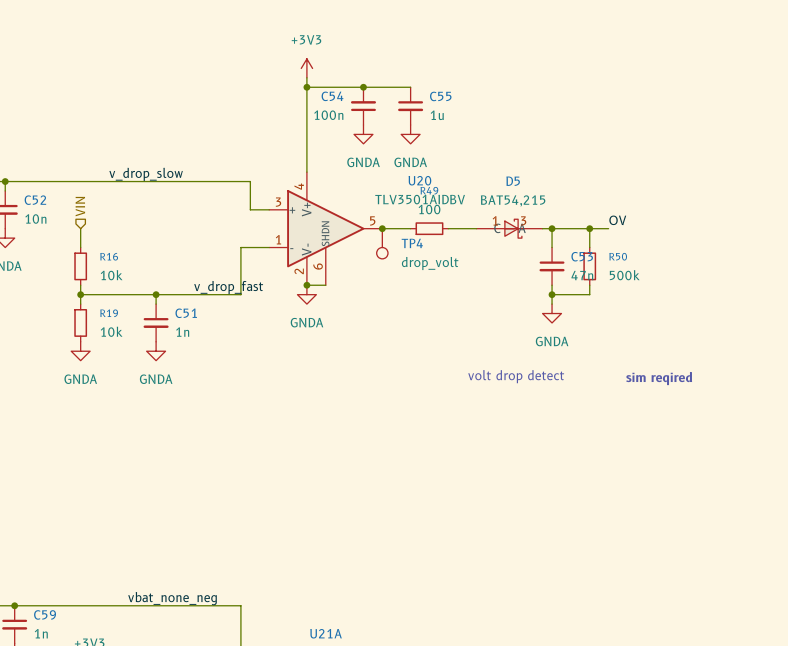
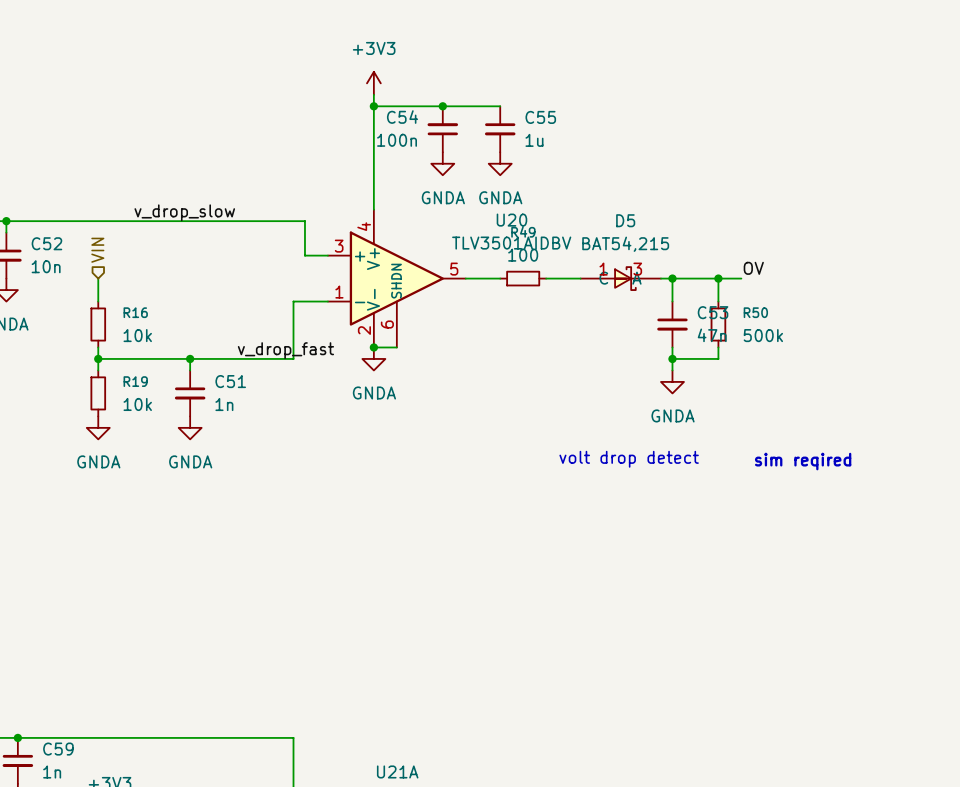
junction: (382, 228) -> none
TP4: drop_volt (382, 243) -> none
label: vbat_none_neg (172, 598) -> none

